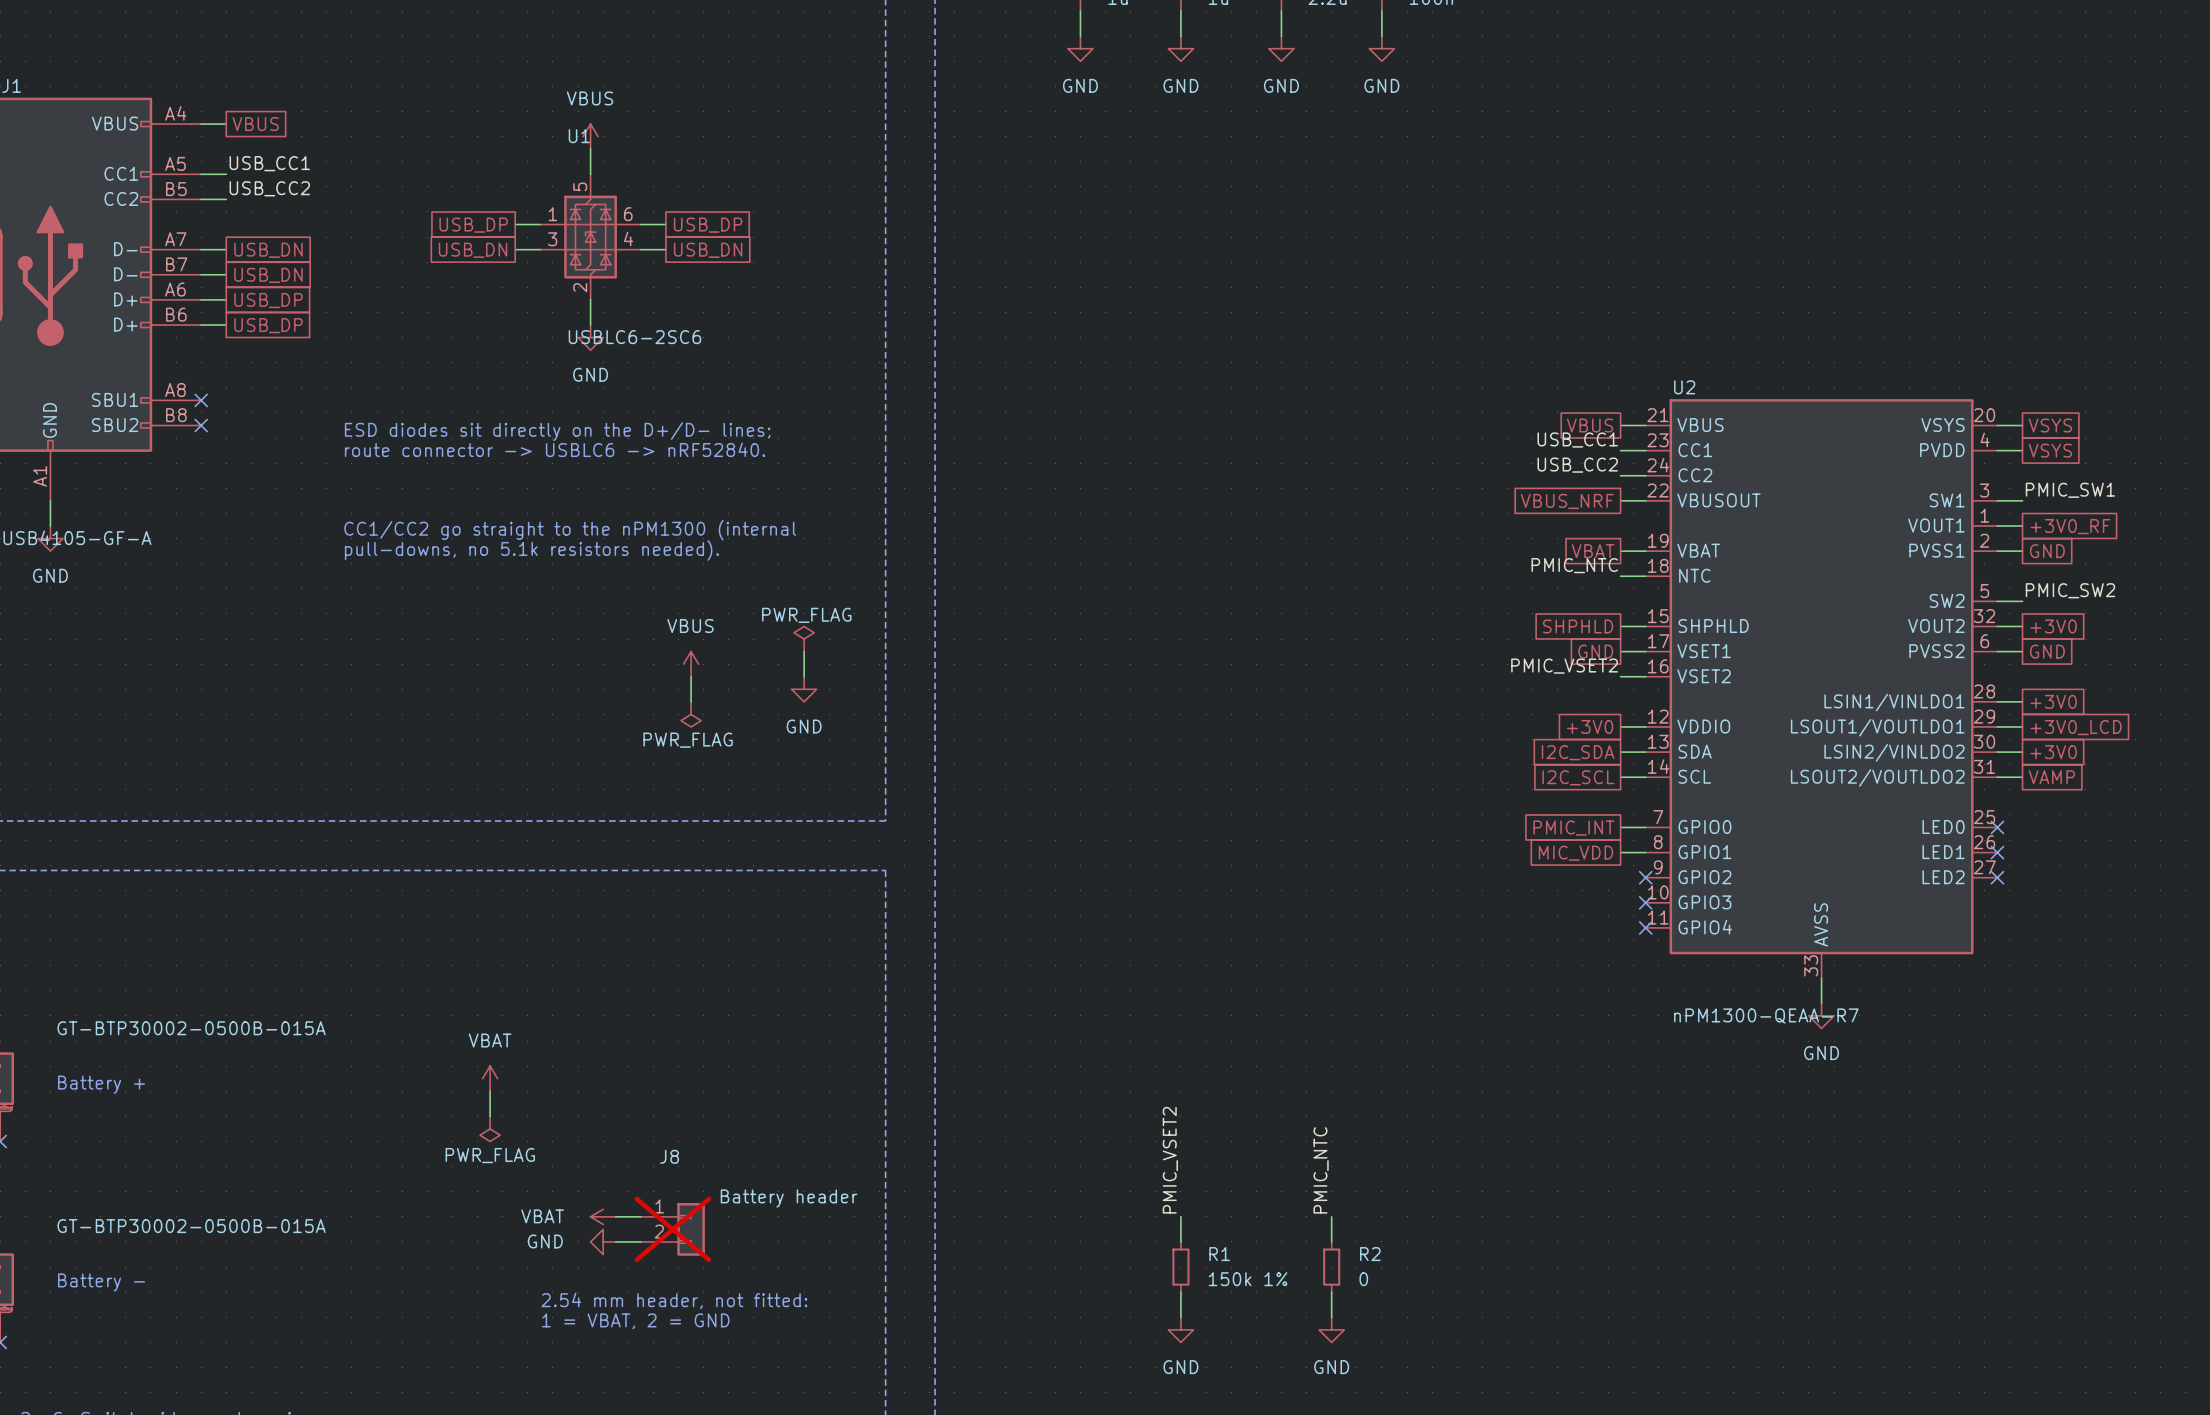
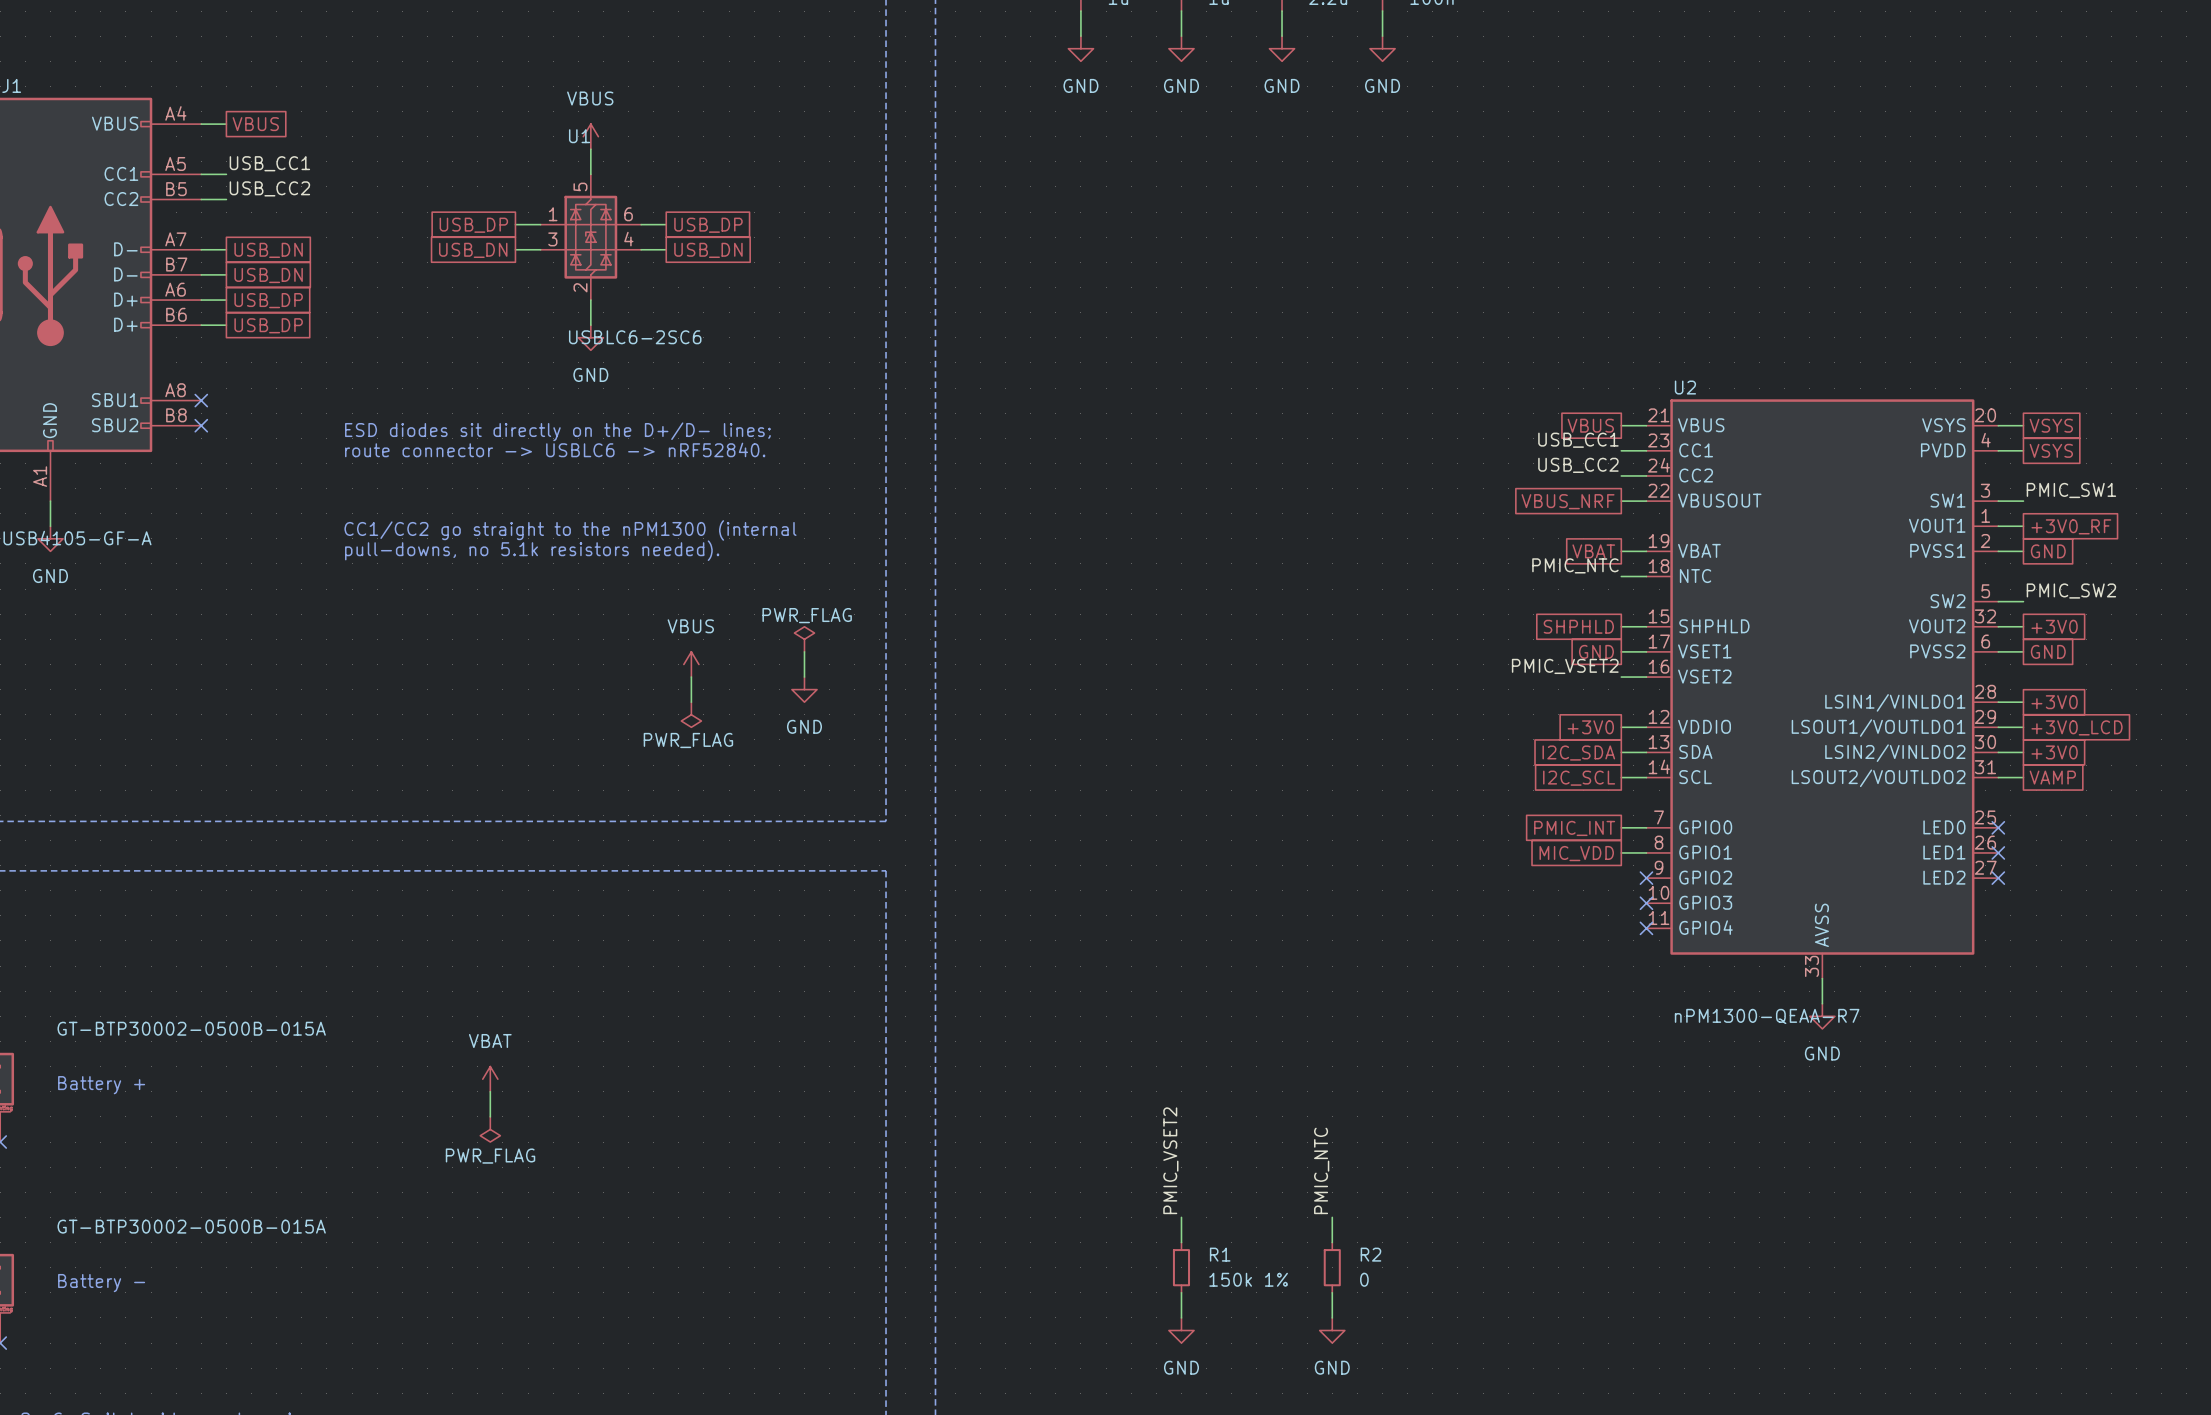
power symbol: VBAT (603, 1216) -> none
wire: (615, 1216) (640, 1216) -> none
J8: Battery header (672, 1229) -> none
power symbol: GND (603, 1241) -> none
wire: (615, 1241) (640, 1241) -> none
text: 2.54 mm header, not fitted: (674, 1300) -> none
text: 1 = VBAT, 2 = GND (635, 1321) -> none

